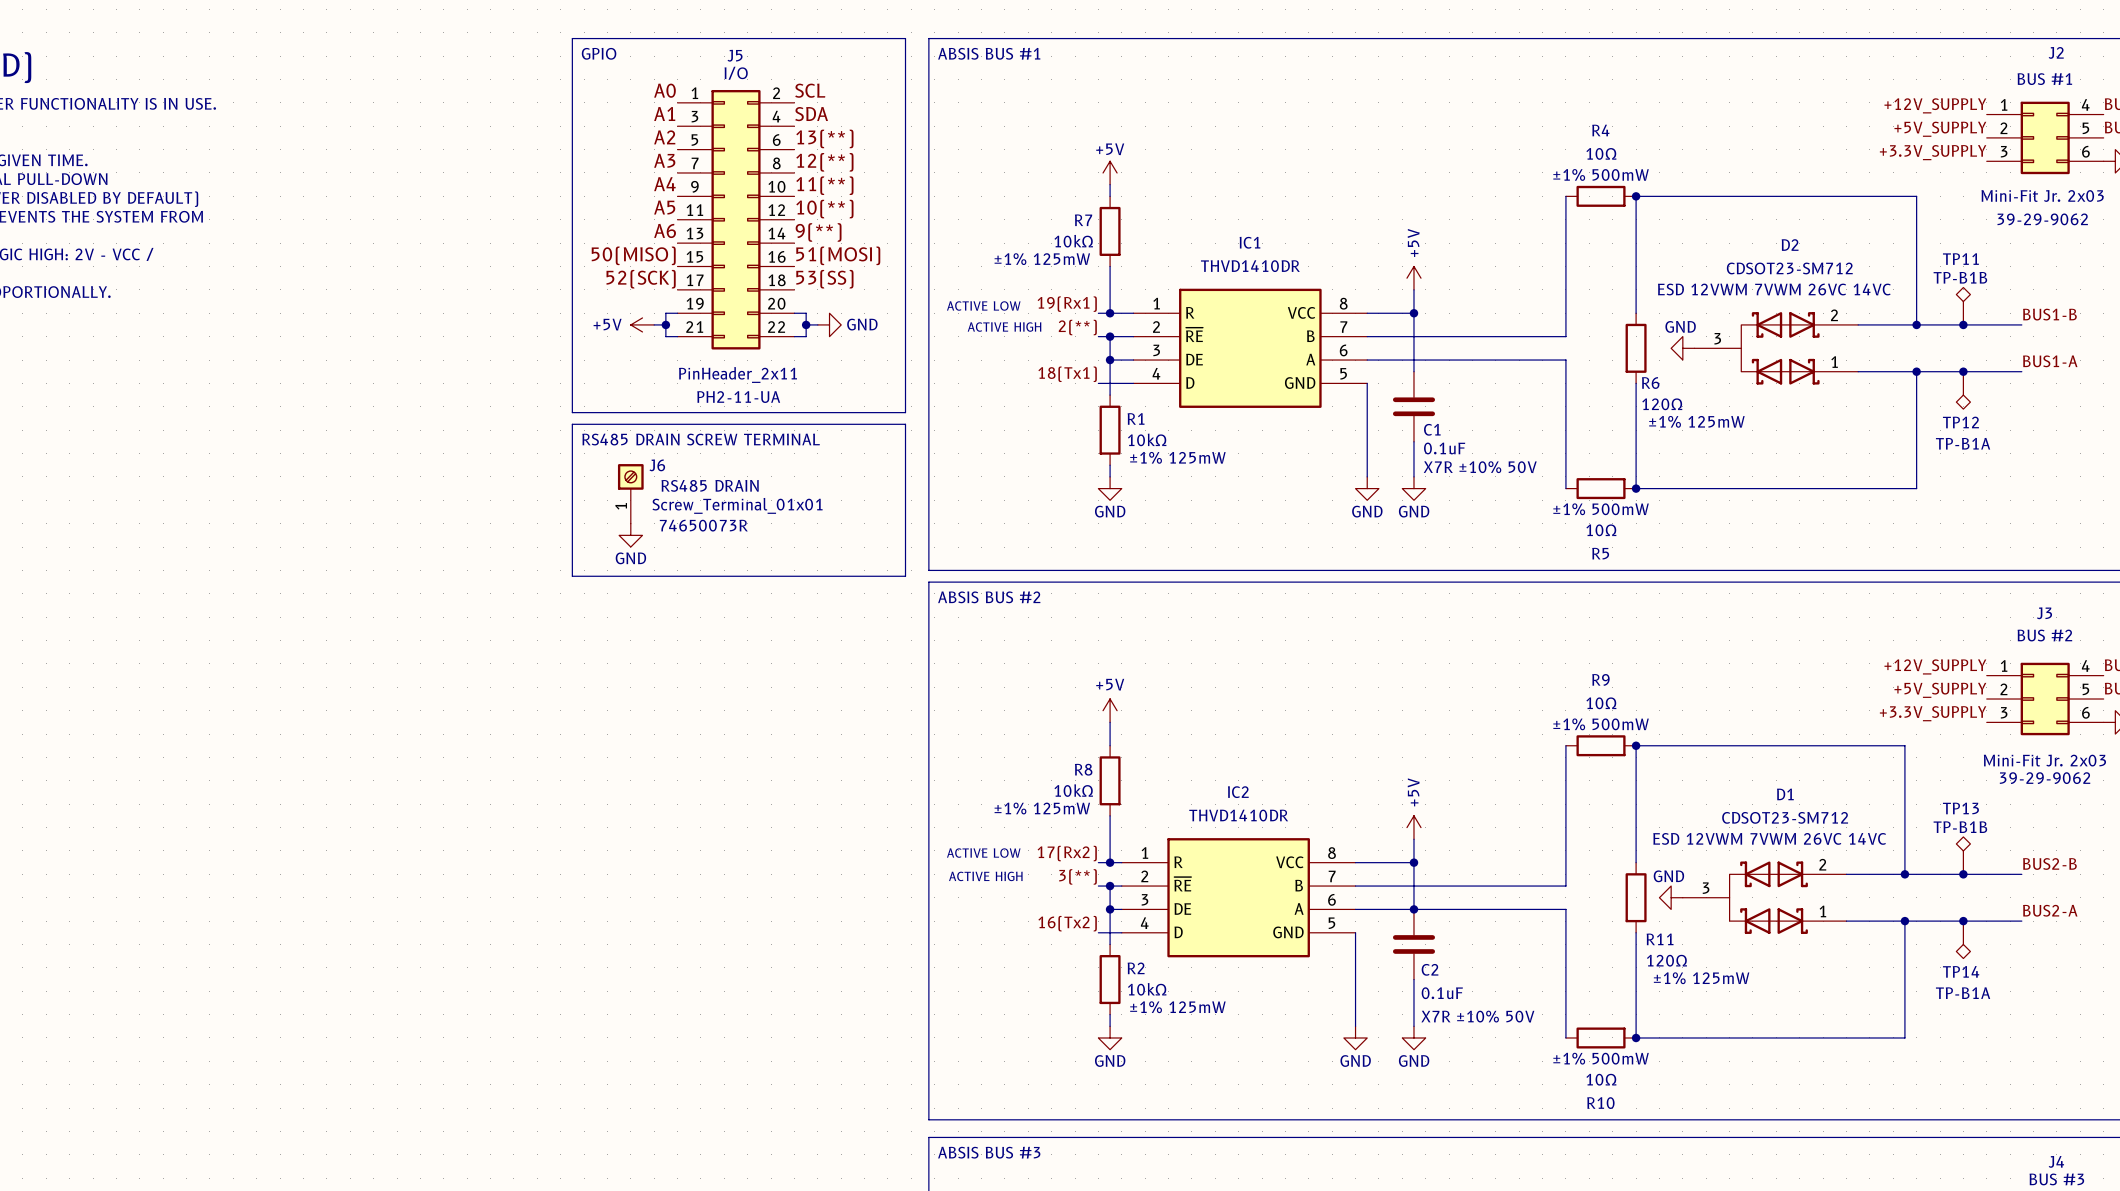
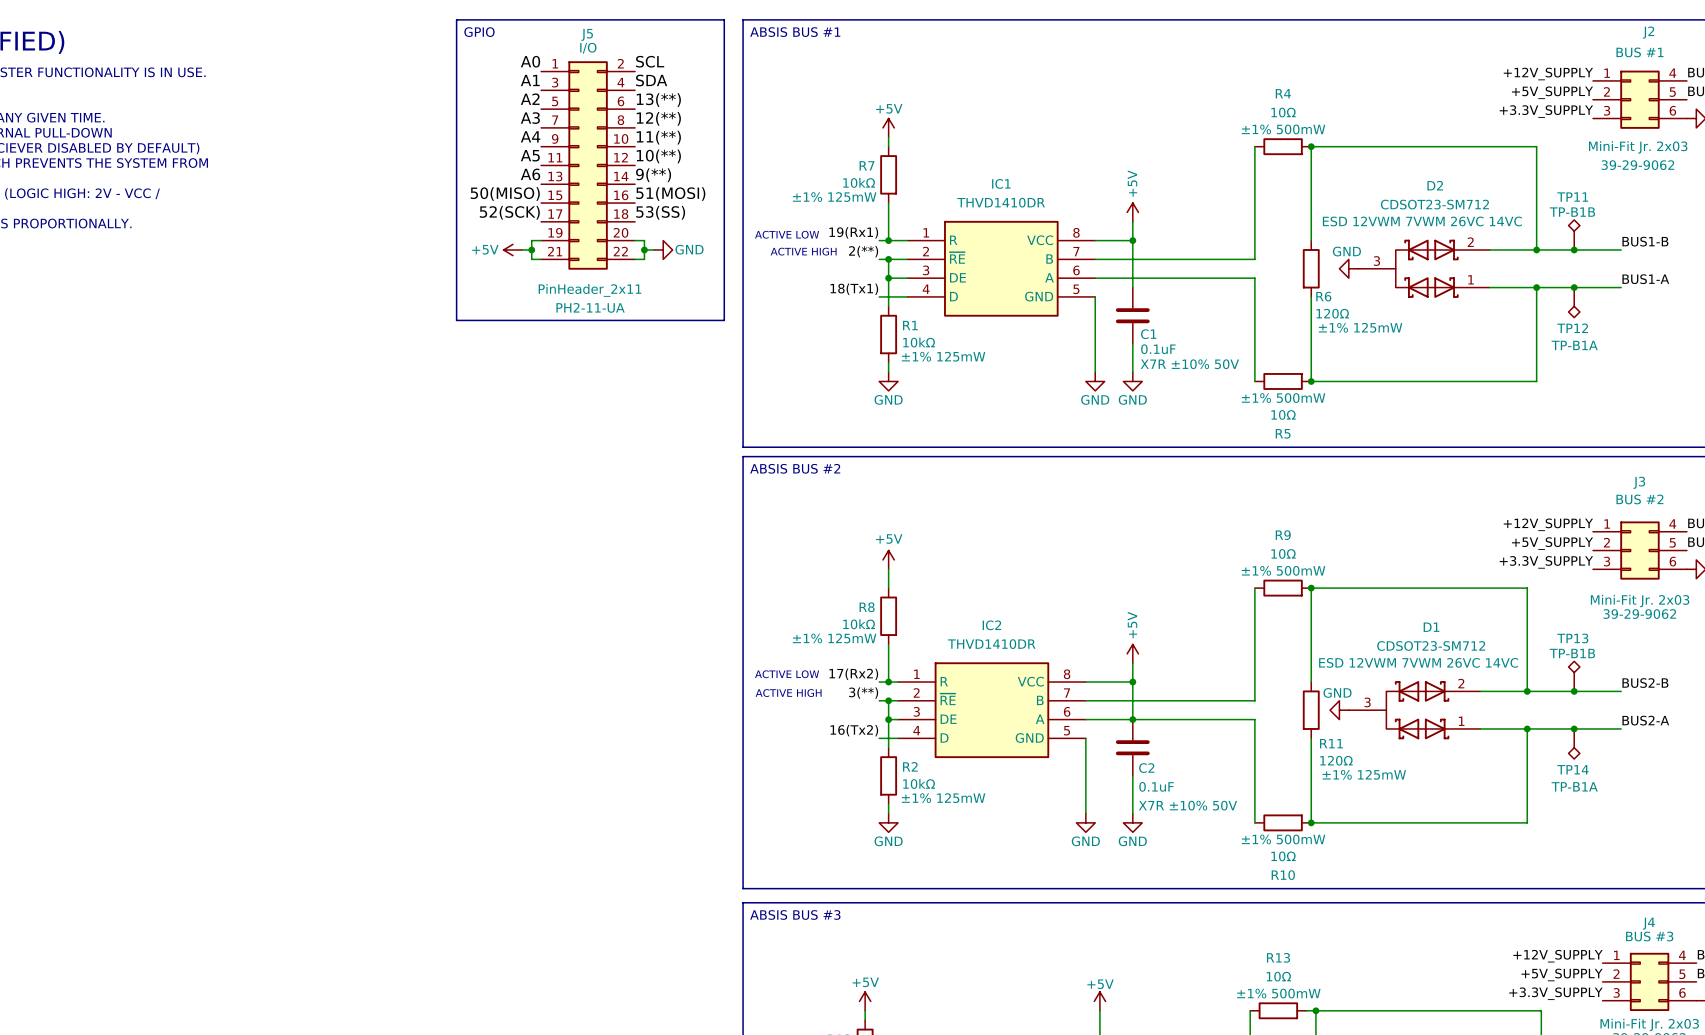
line: (572, 424) (905, 424) (905, 576) (572, 576) (572, 424) -> none
text: RS485 DRAIN SCREW TERMINAL (701, 439) -> none
J6: Screw_Terminal_01x01 (630, 493) -> none
power symbol: GND (630, 535) -> none

